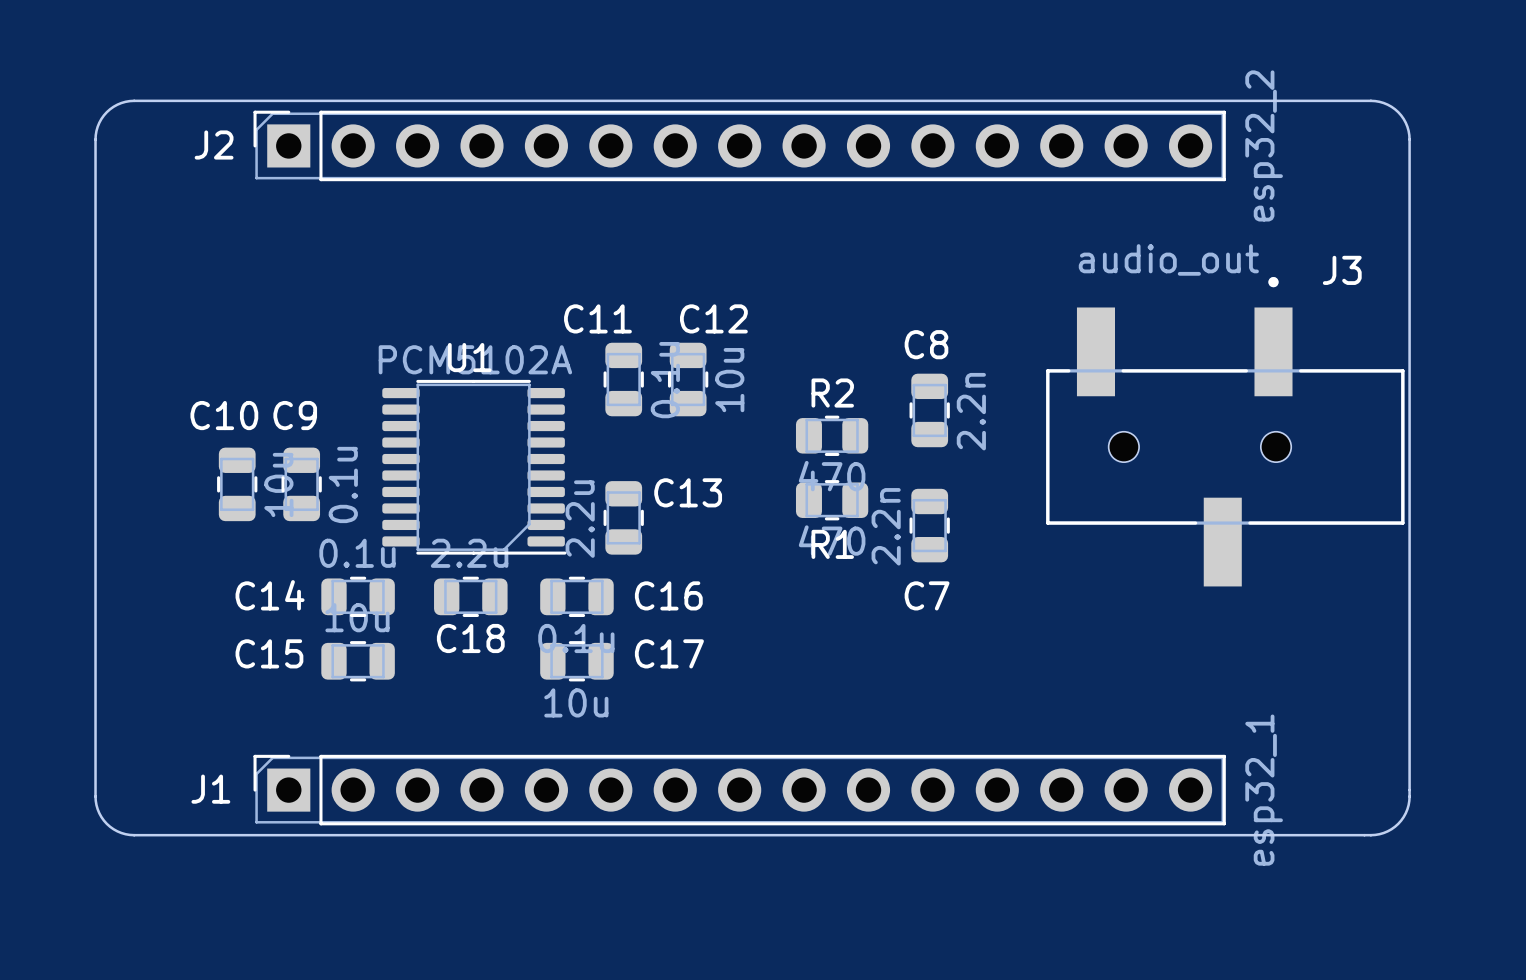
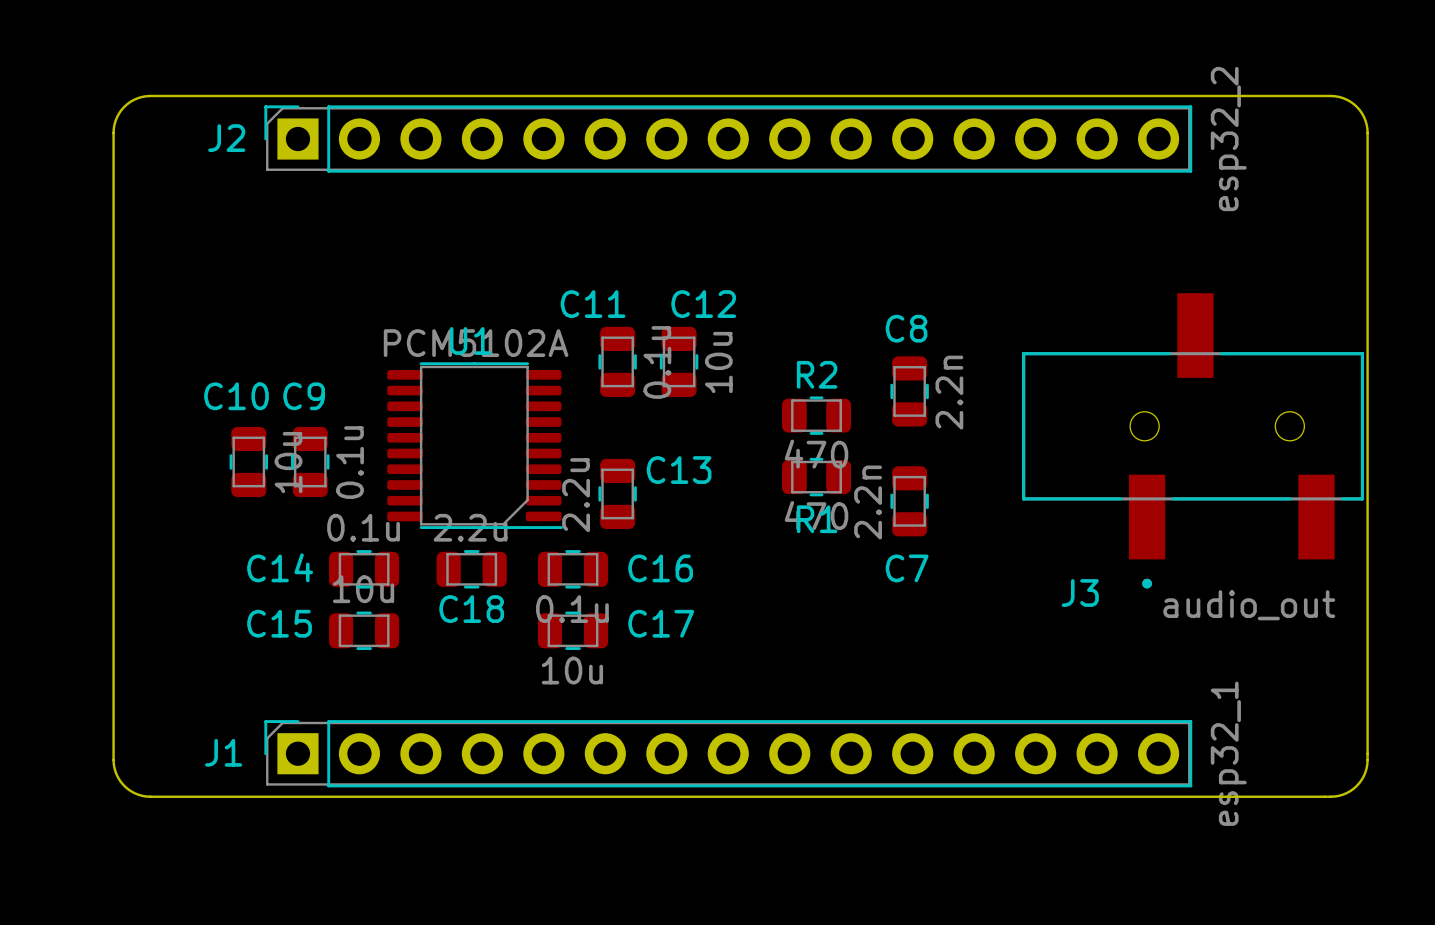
J3 rotation: 0° (1225, 431) -> 180° (1193, 440)

